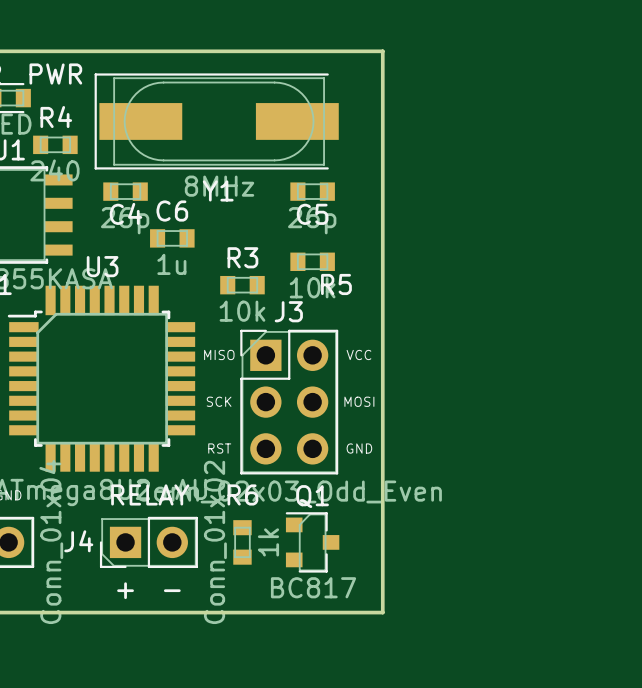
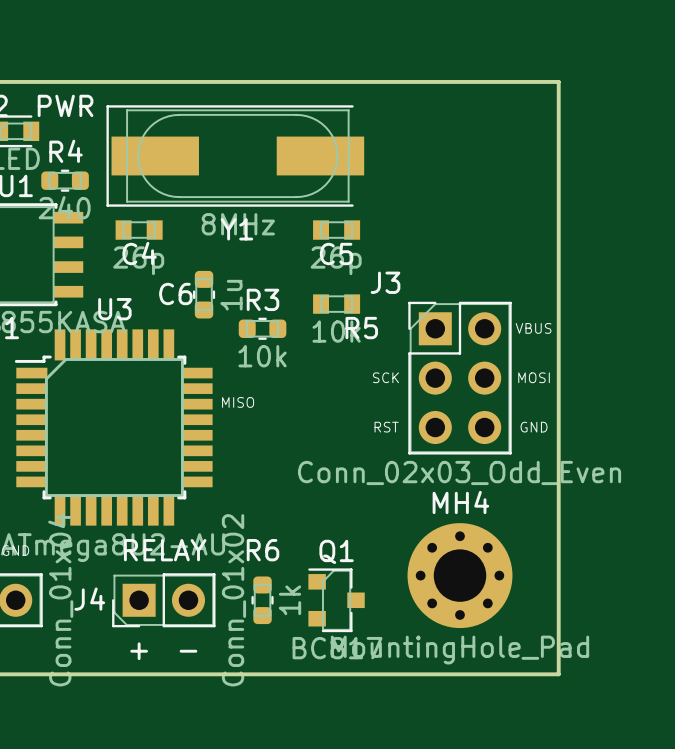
board edge: (382, 51) (382, 612) -> (410, 81) (558, 81) (558, 674) (410, 674)
R4 footprint: [33, 135, 78, 155] -> [41, 169, 89, 192]
C6 name position: C6 (172, 211) -> C6 (175, 293)
C6 footprint: [150, 229, 195, 248] -> [192, 270, 216, 319]
C6 value position: 1u (171, 264) -> 1u (231, 295)
R3 footprint: [220, 275, 265, 295] -> [238, 317, 287, 340]
text: none -> VBUS (533, 328)
J3 name position: J3 (288, 311) -> J3 (385, 282)
text: VCC (358, 354) -> none
text position: SCK (219, 401) -> SCK (385, 377)
text position: MOSI (359, 401) -> MOSI (534, 377)
J3 position: (289, 402) -> (459, 378)
text position: RST (219, 448) -> RST (386, 427)
text position: GND (359, 448) -> GND (534, 427)
MH4: none -> MountingHole_Pad (459, 575)
R6 footprint: [233, 520, 252, 565] -> [251, 576, 274, 625]

